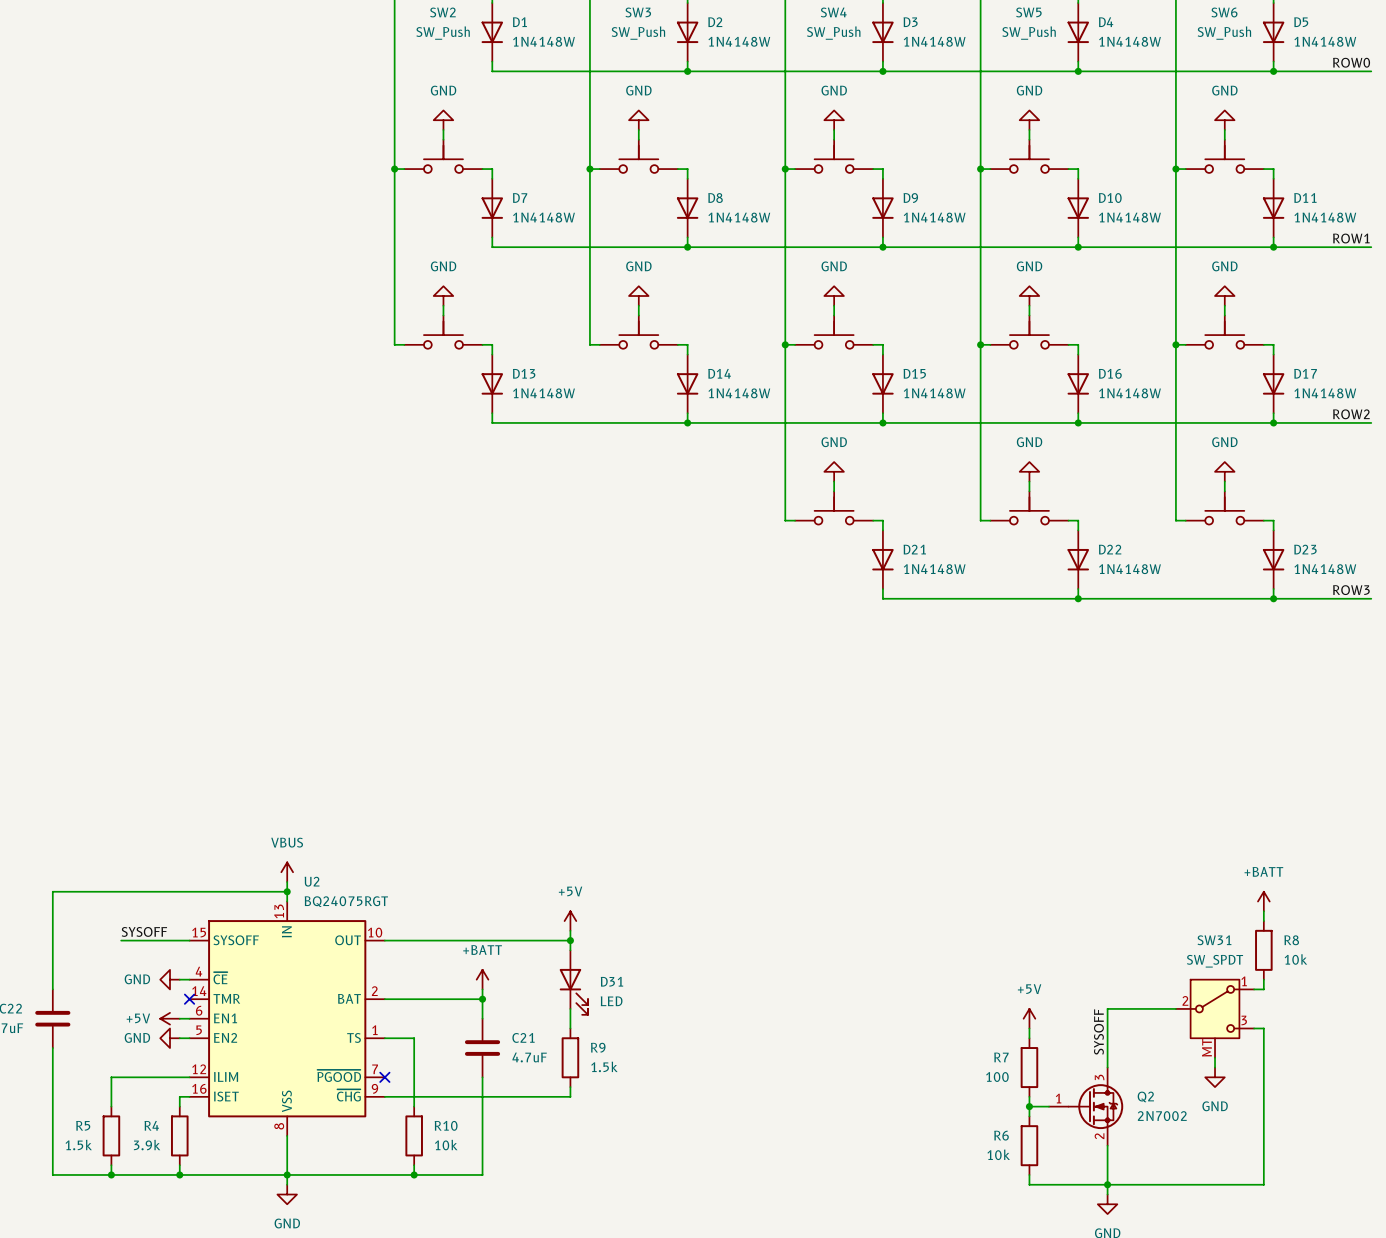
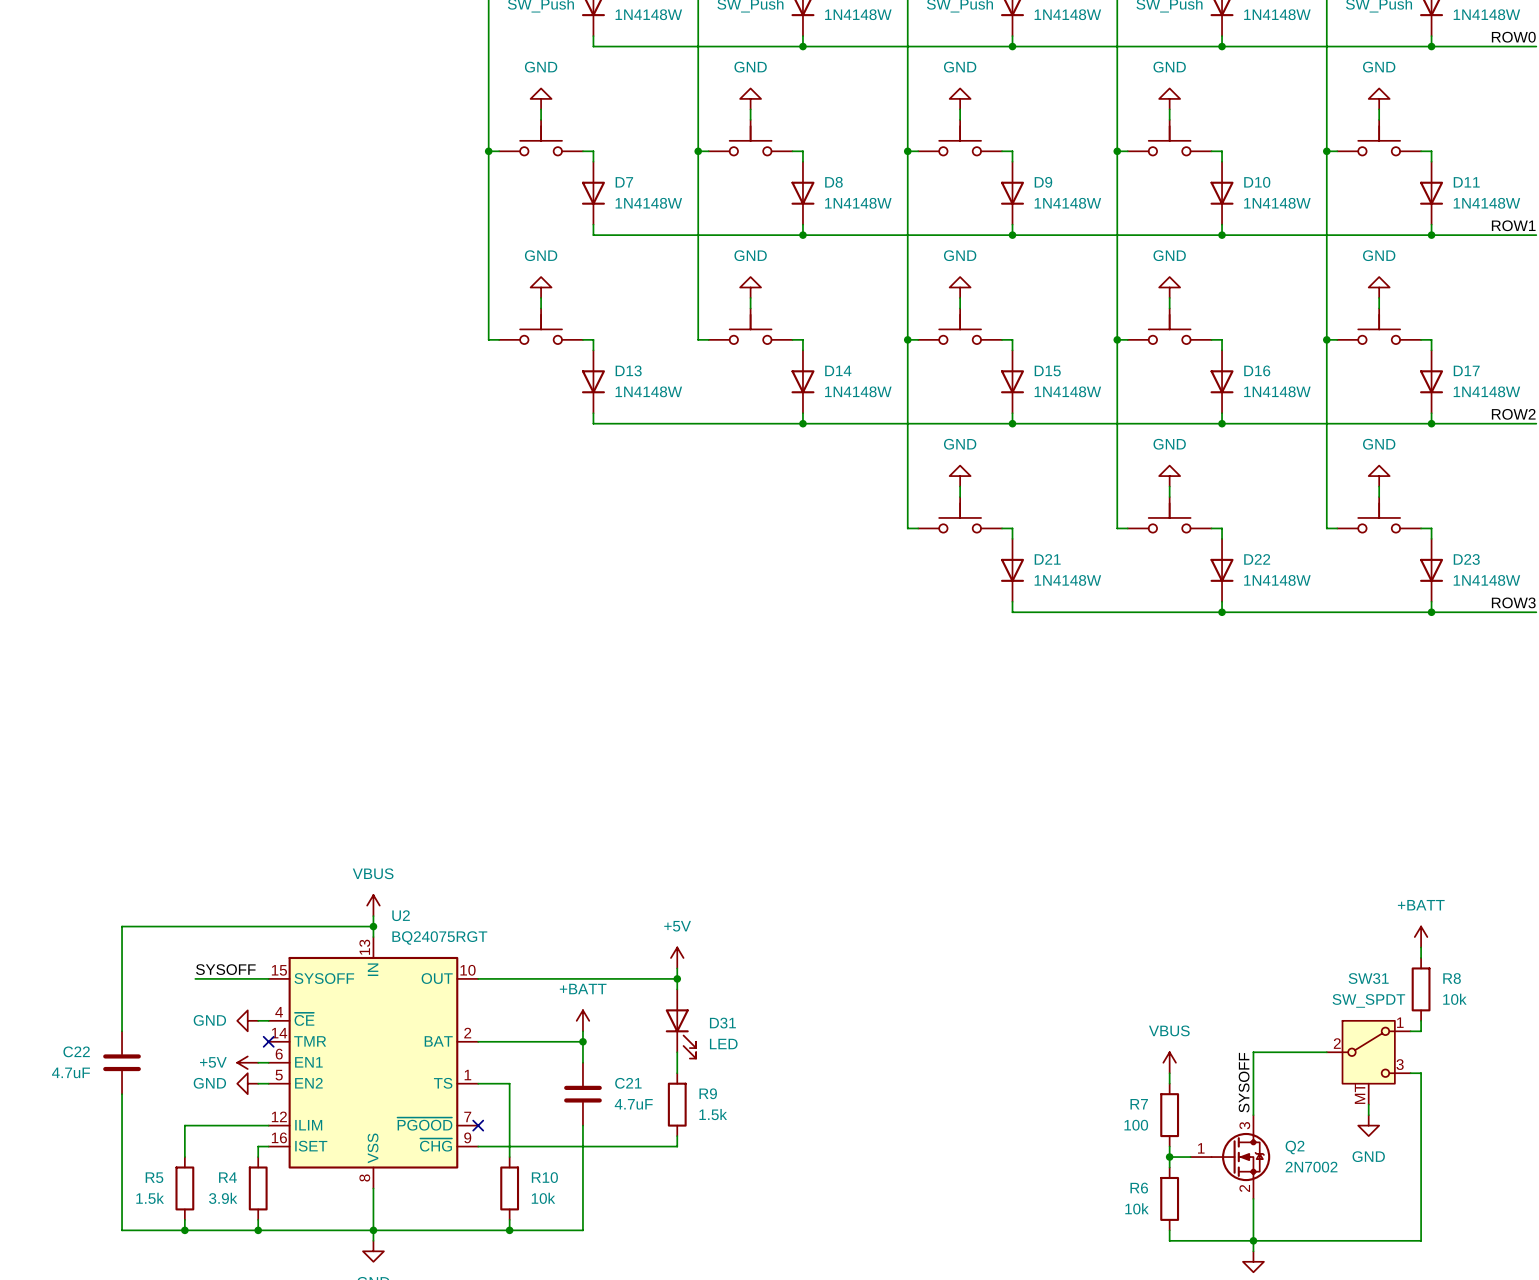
power symbol: +5V (1029, 1018) -> VBUS (1169, 1062)

